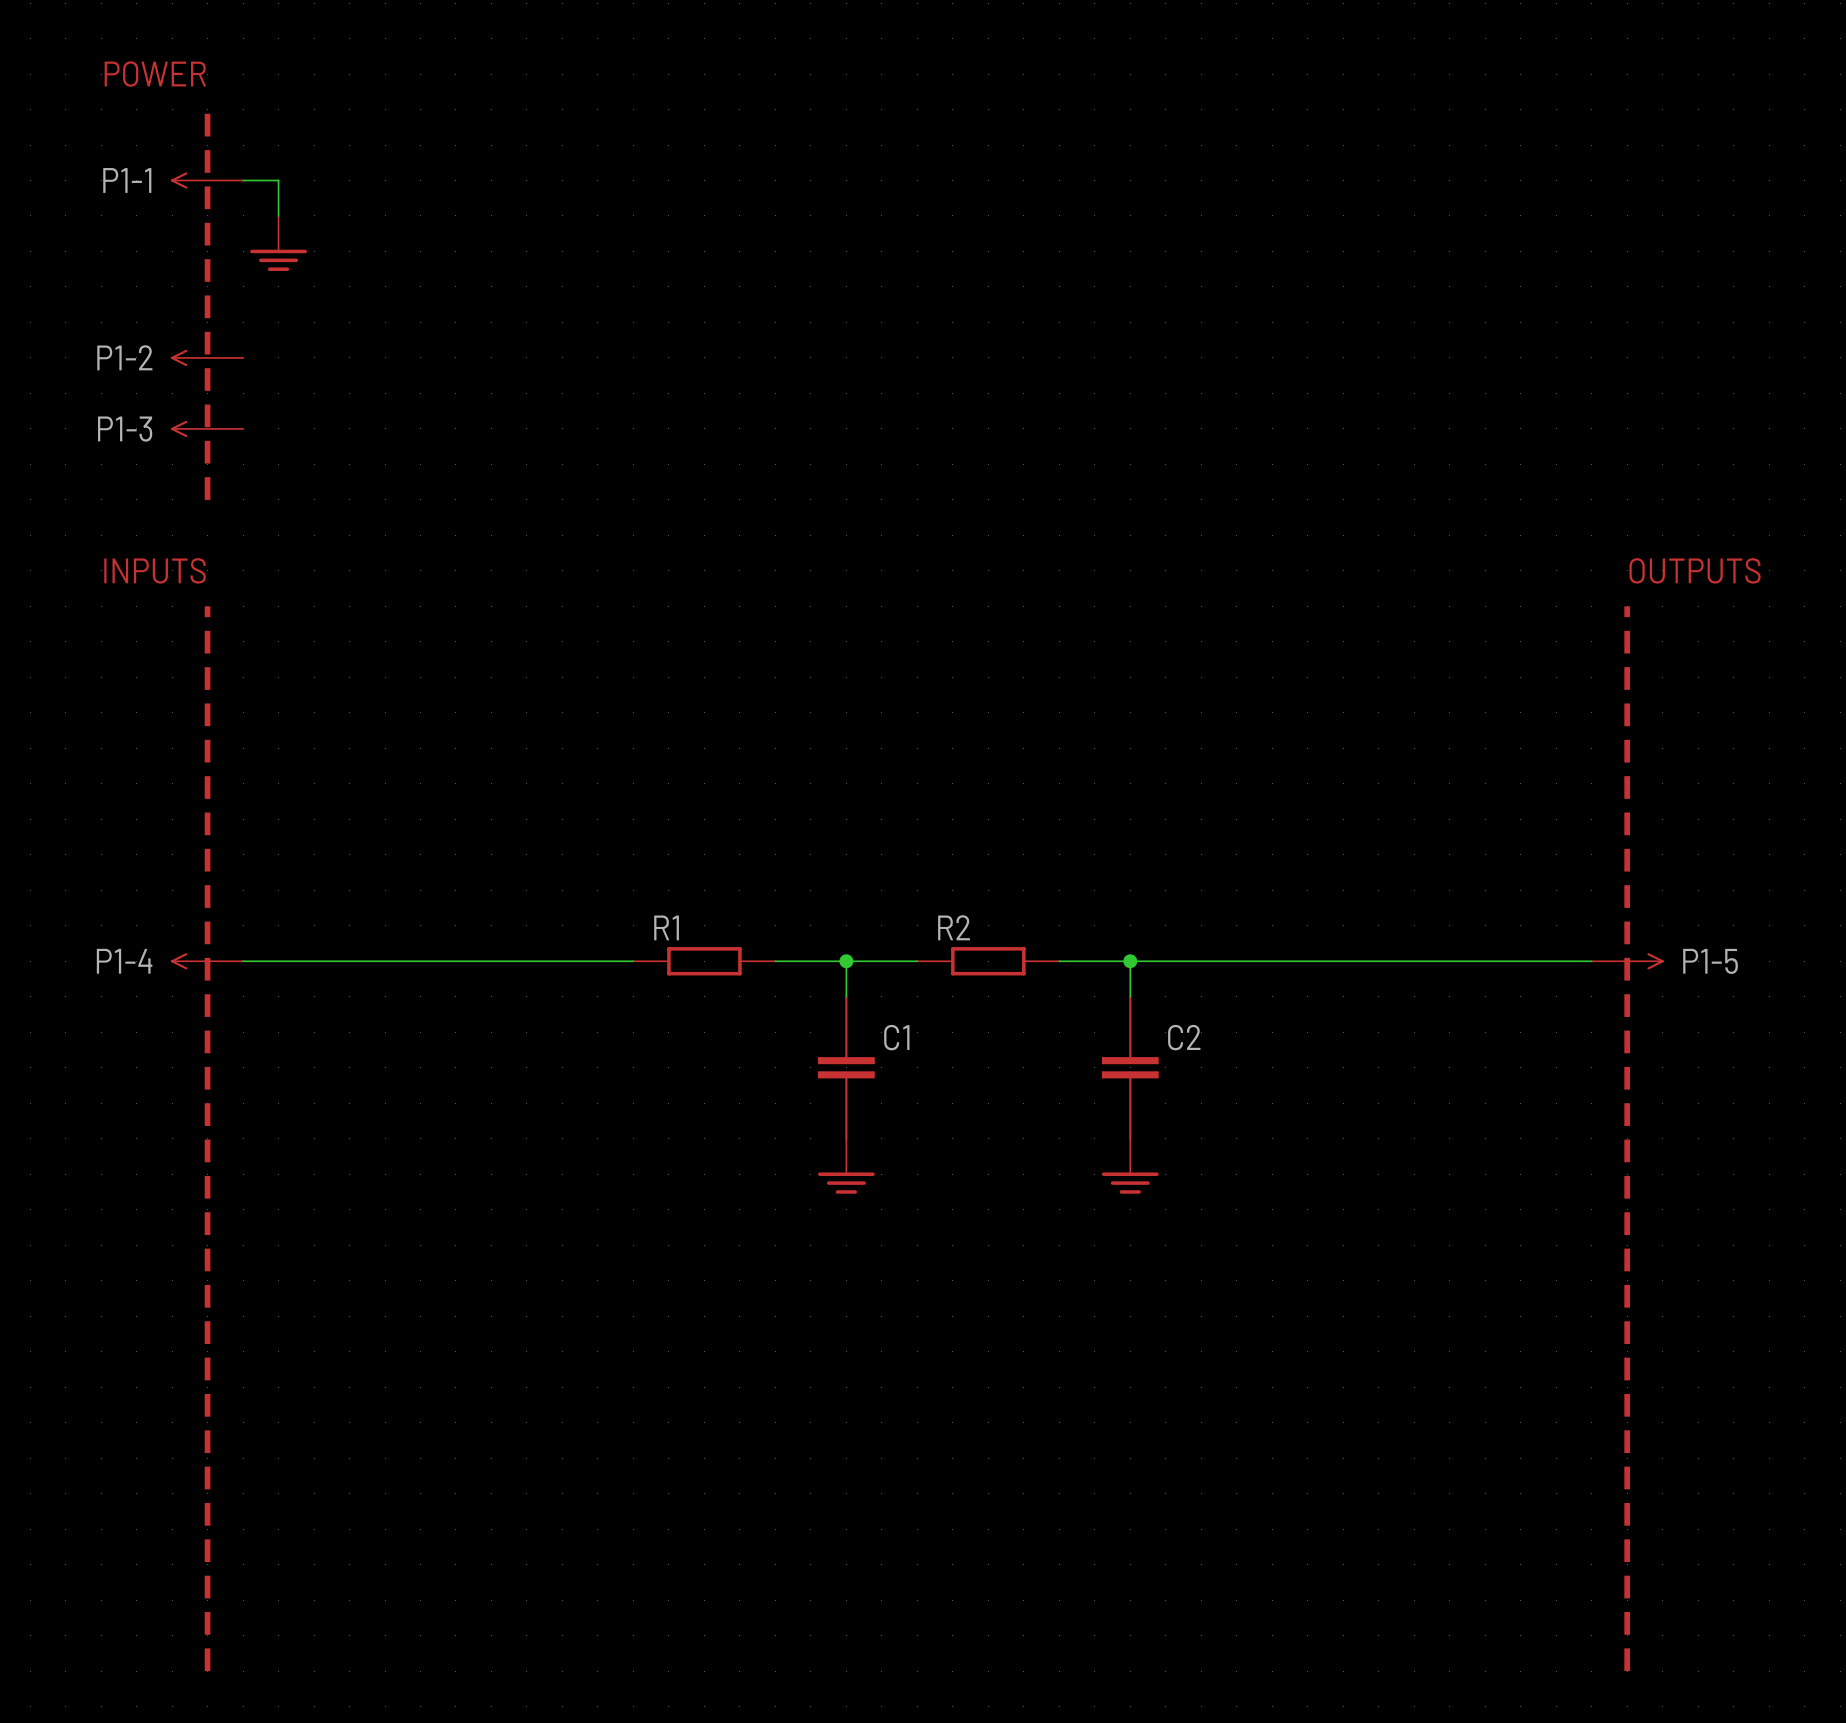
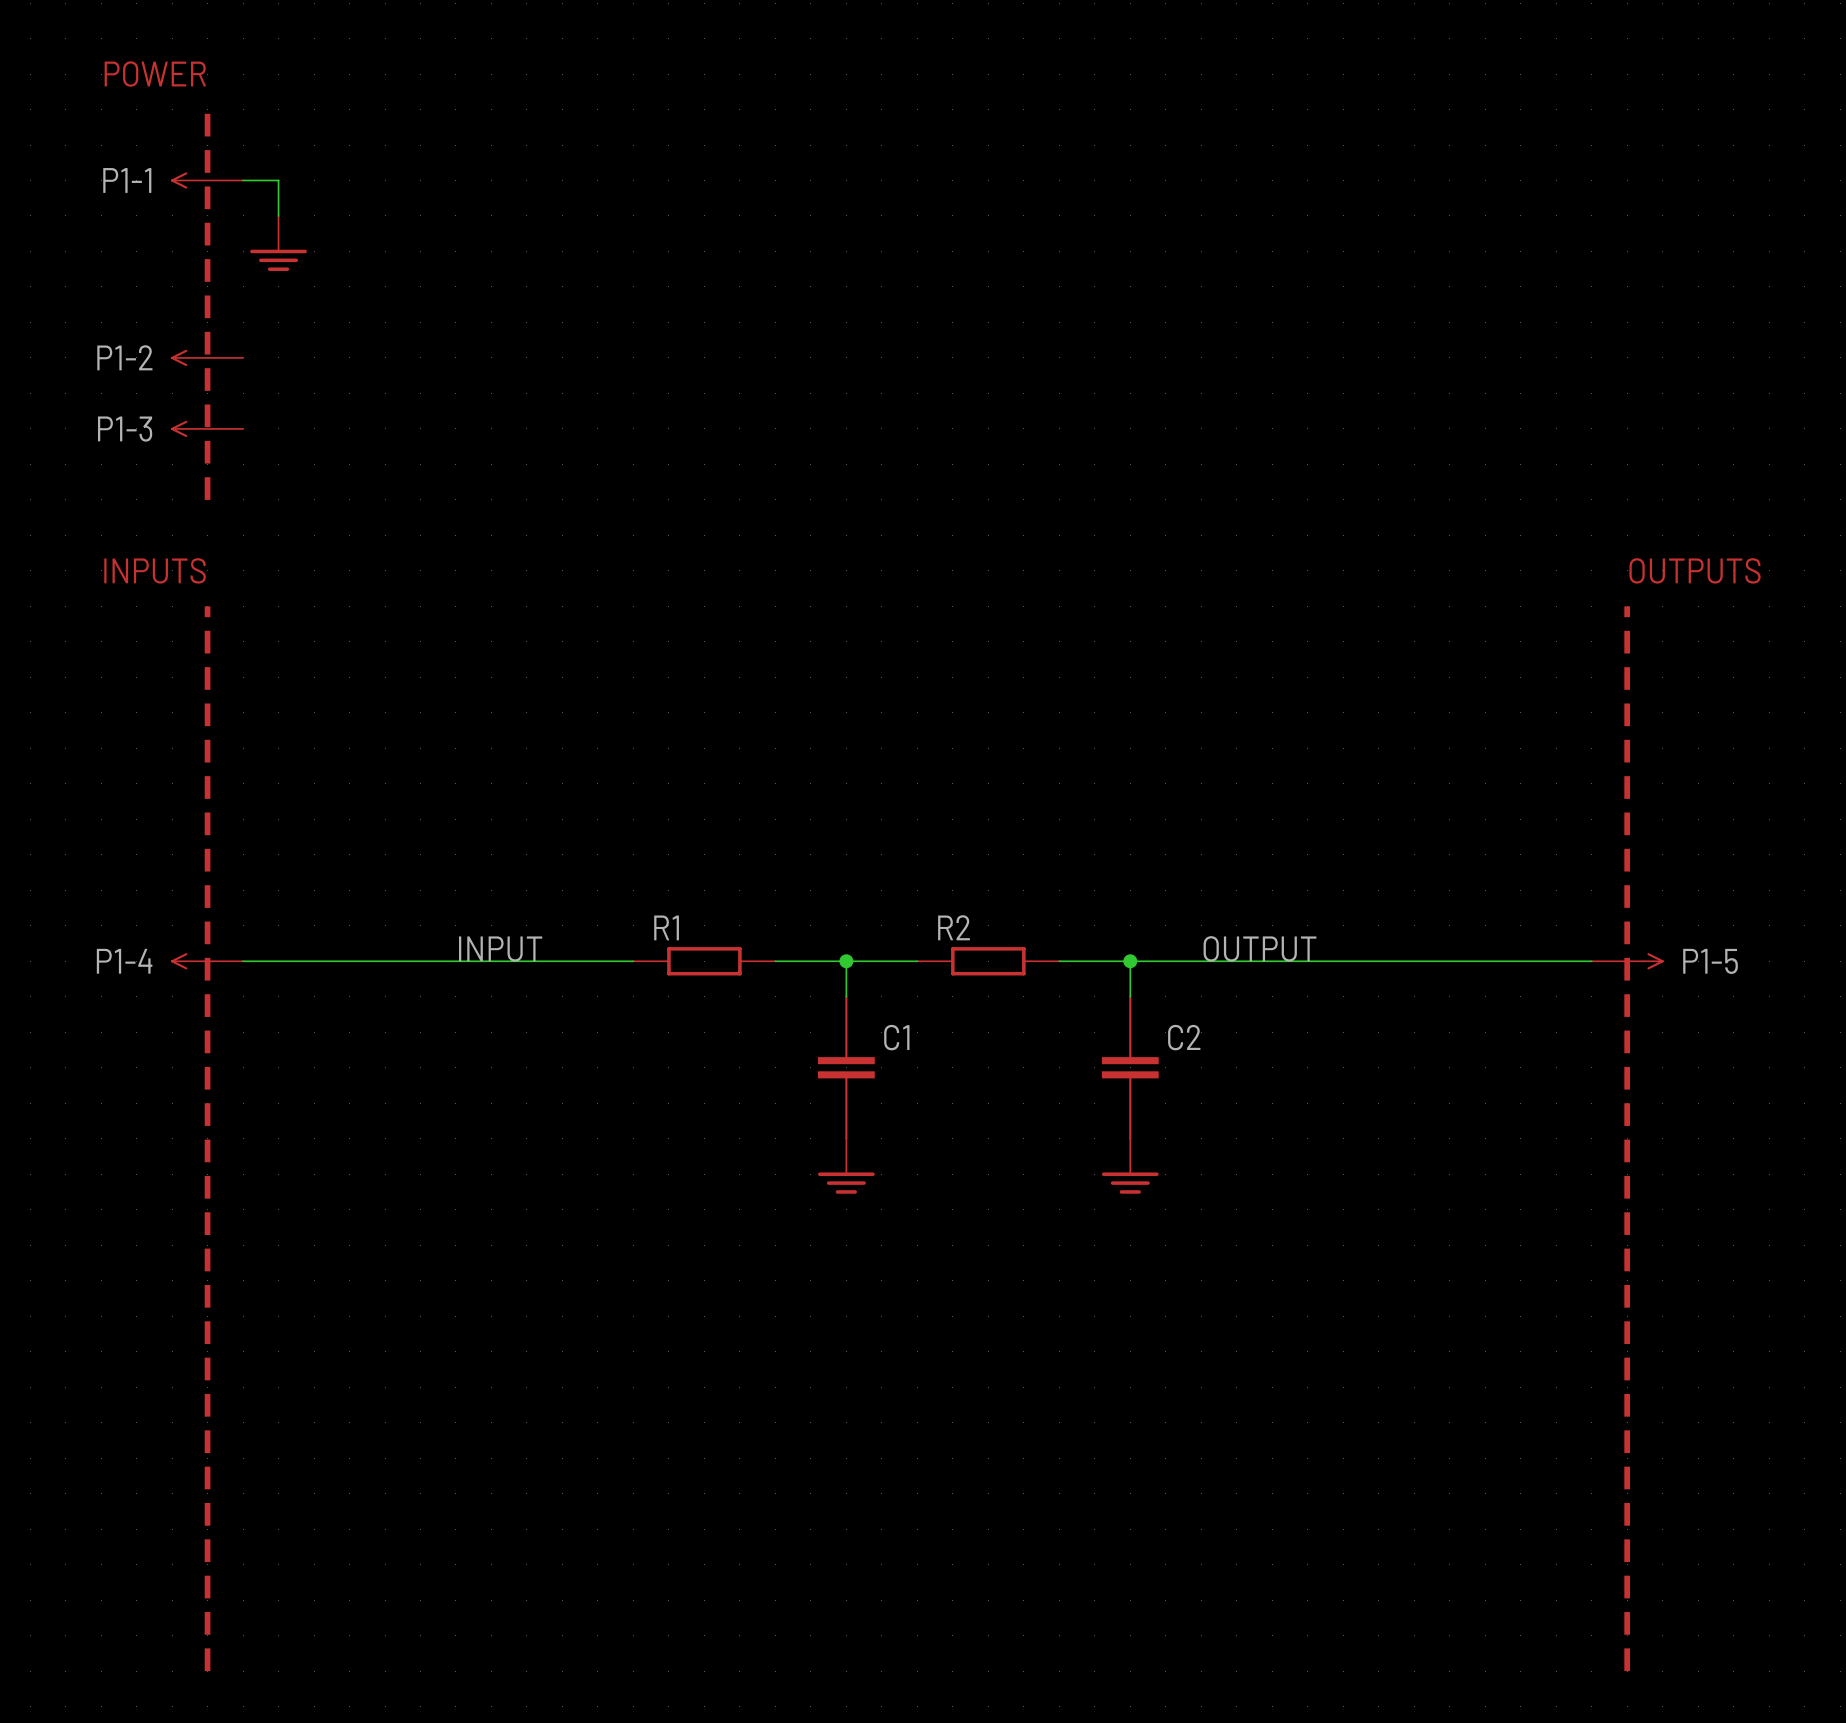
label: none -> INPUT (500, 948)
label: none -> OUTPUT (1260, 948)

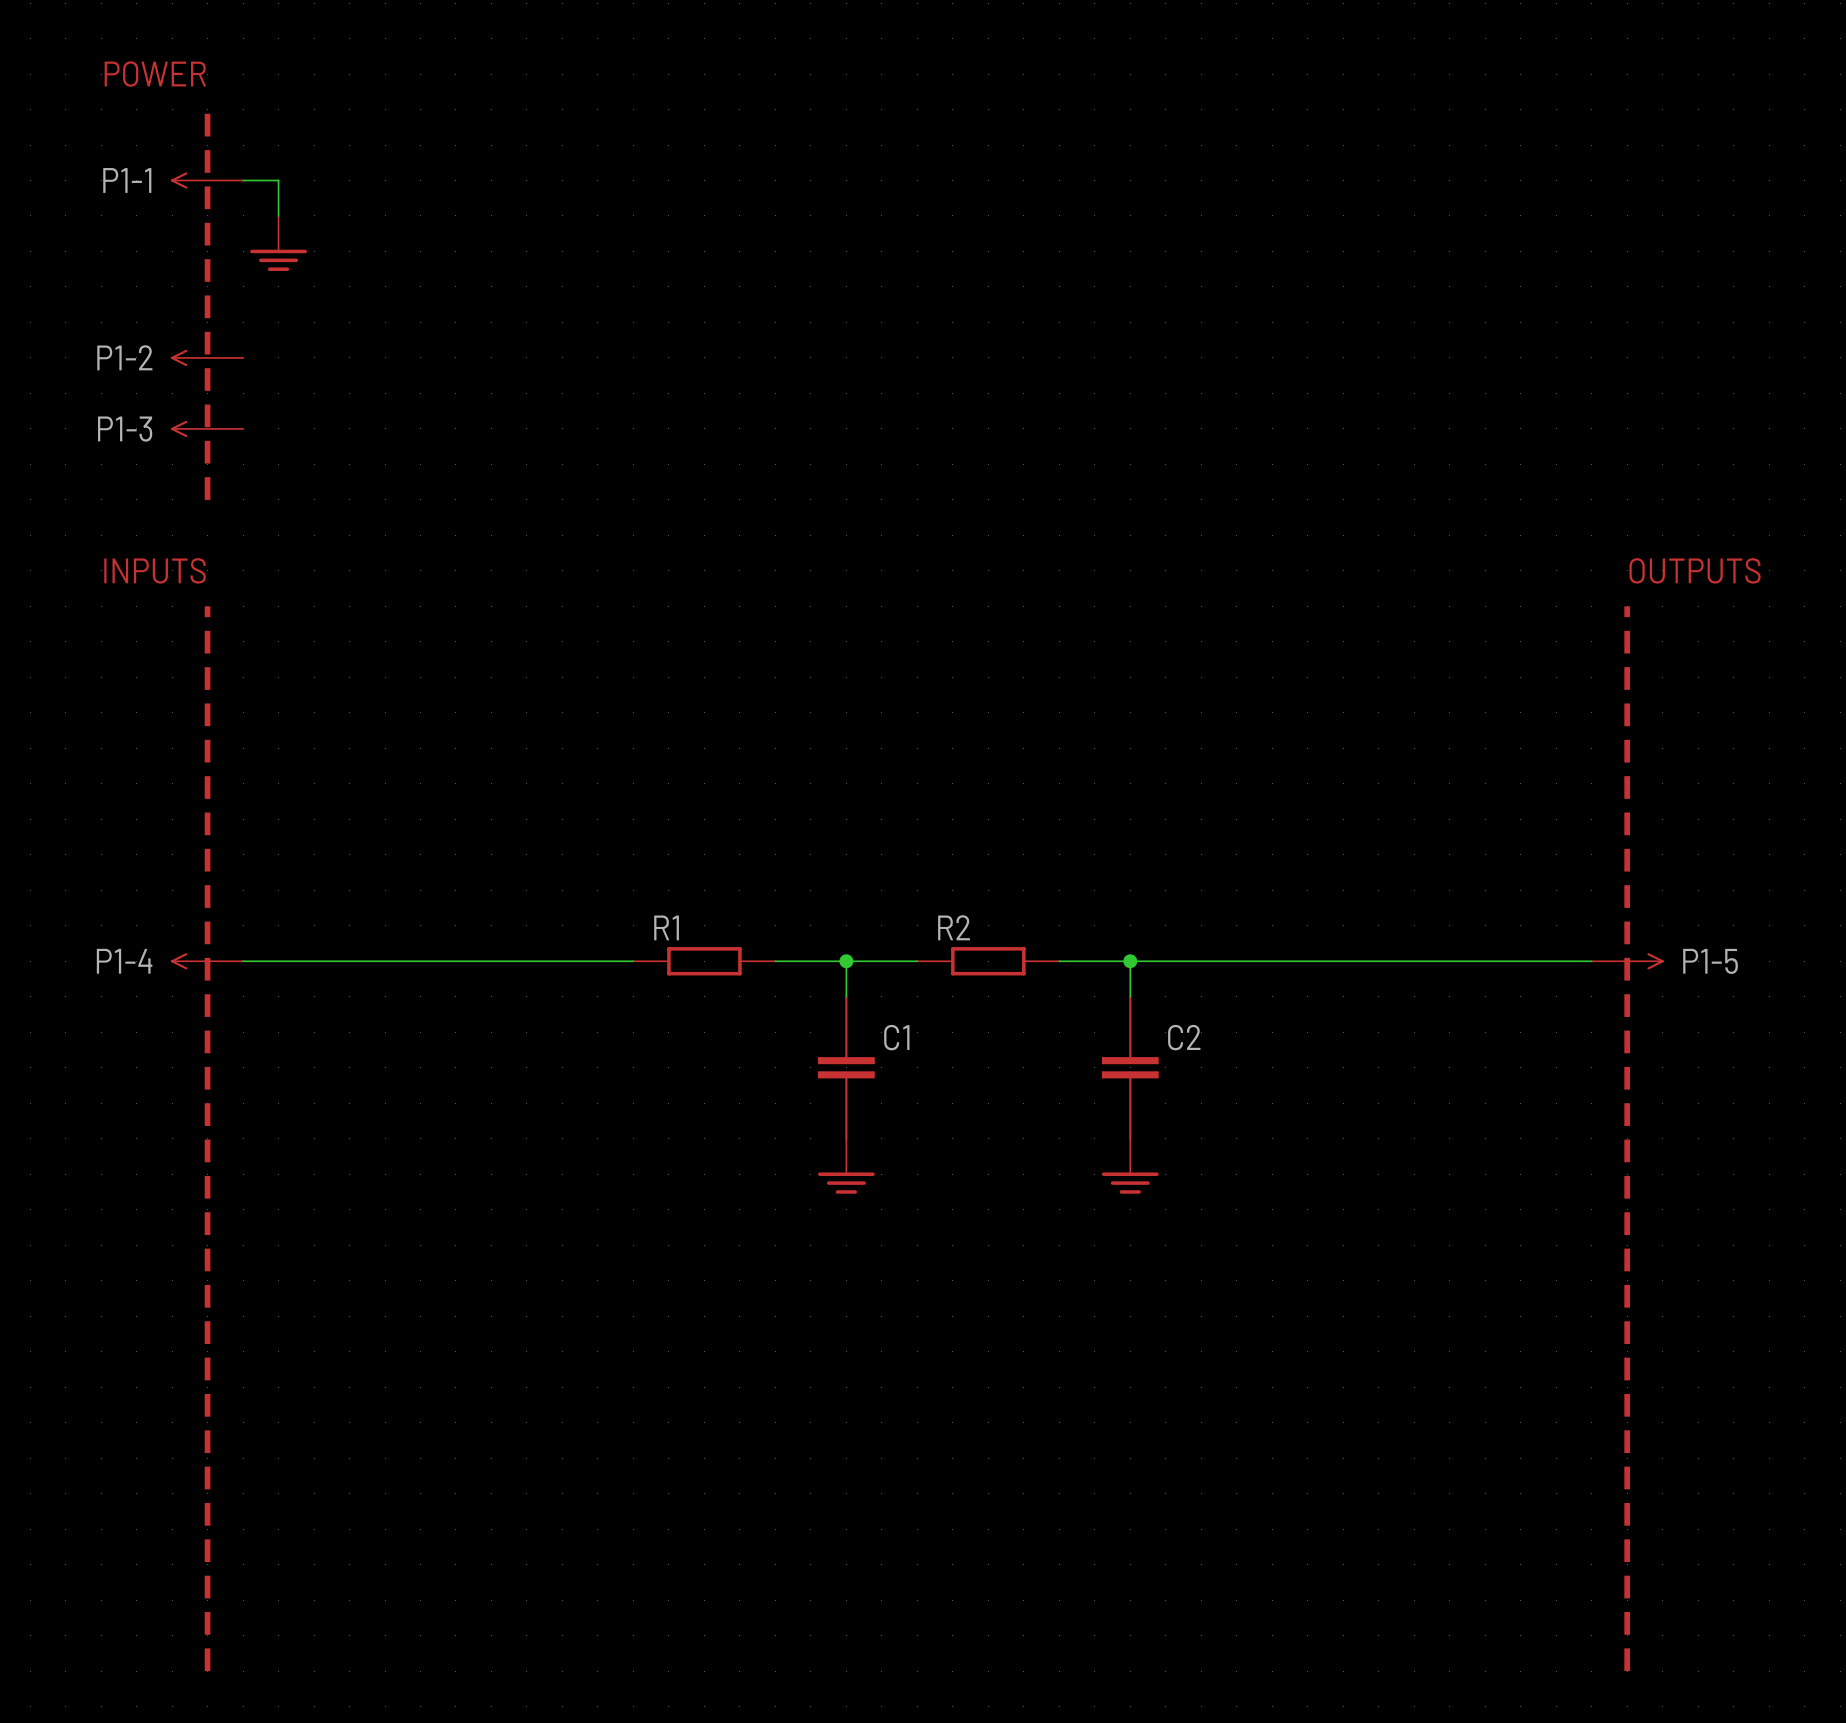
label: INPUT (500, 948) -> none
label: OUTPUT (1260, 948) -> none

